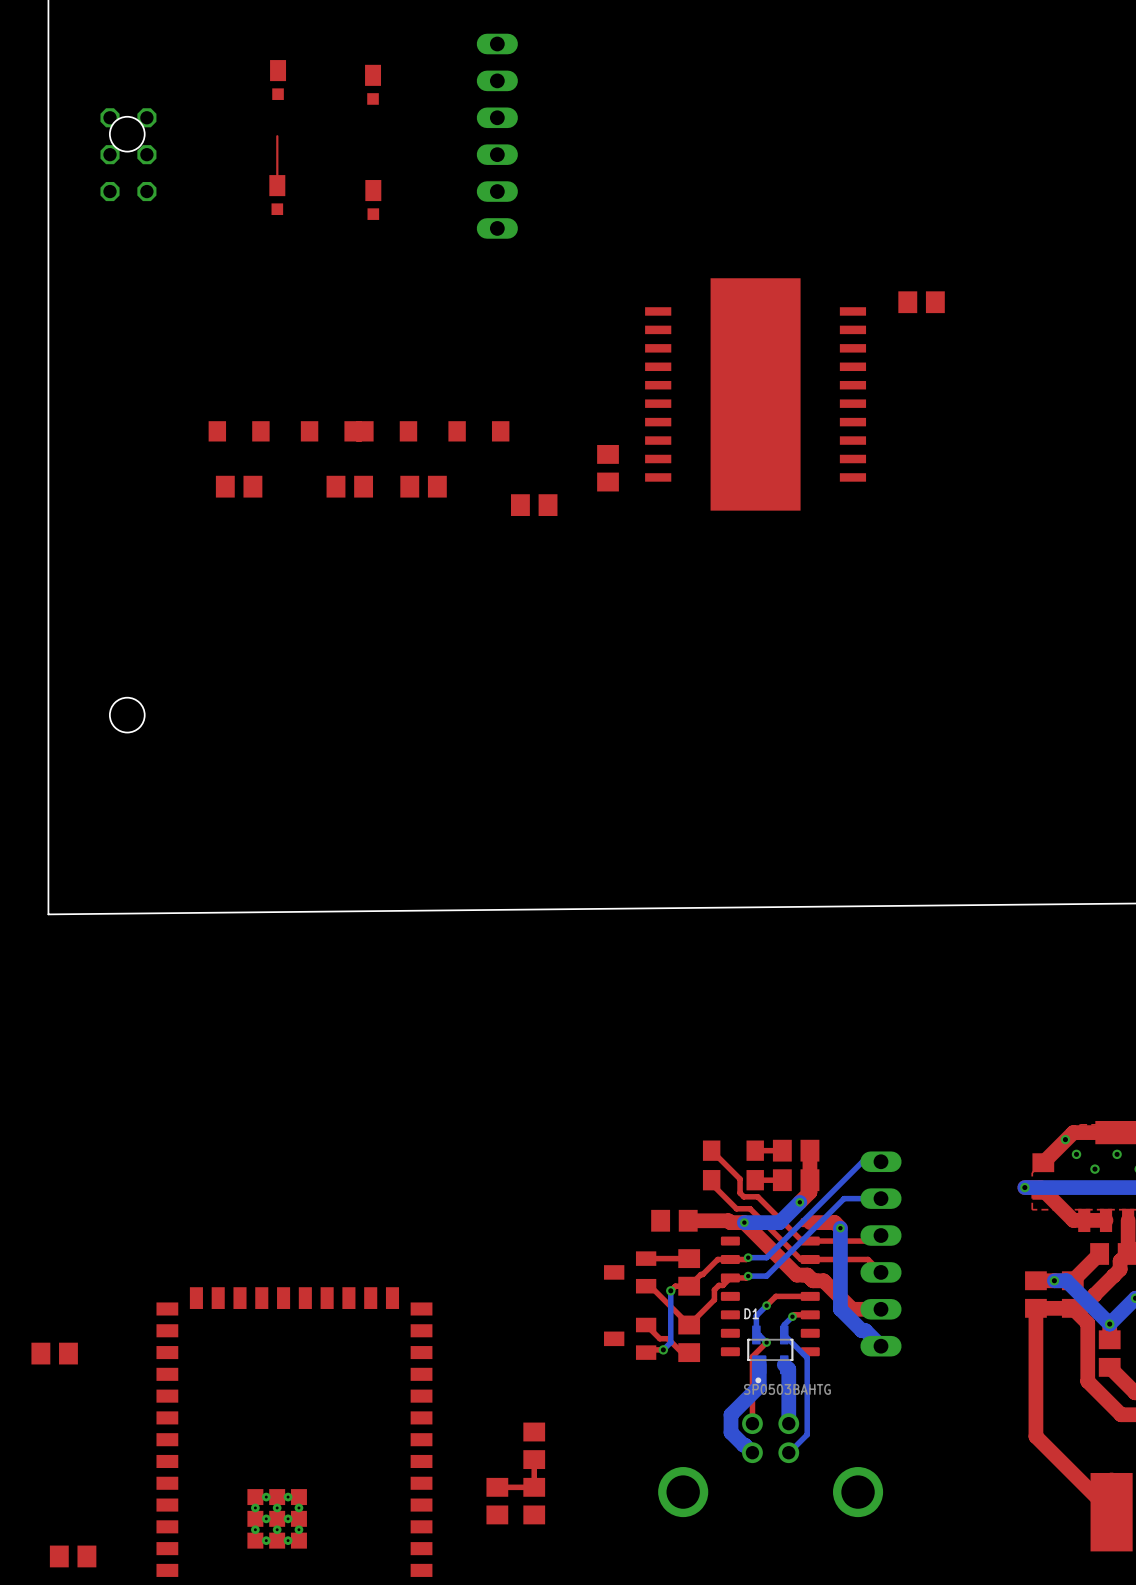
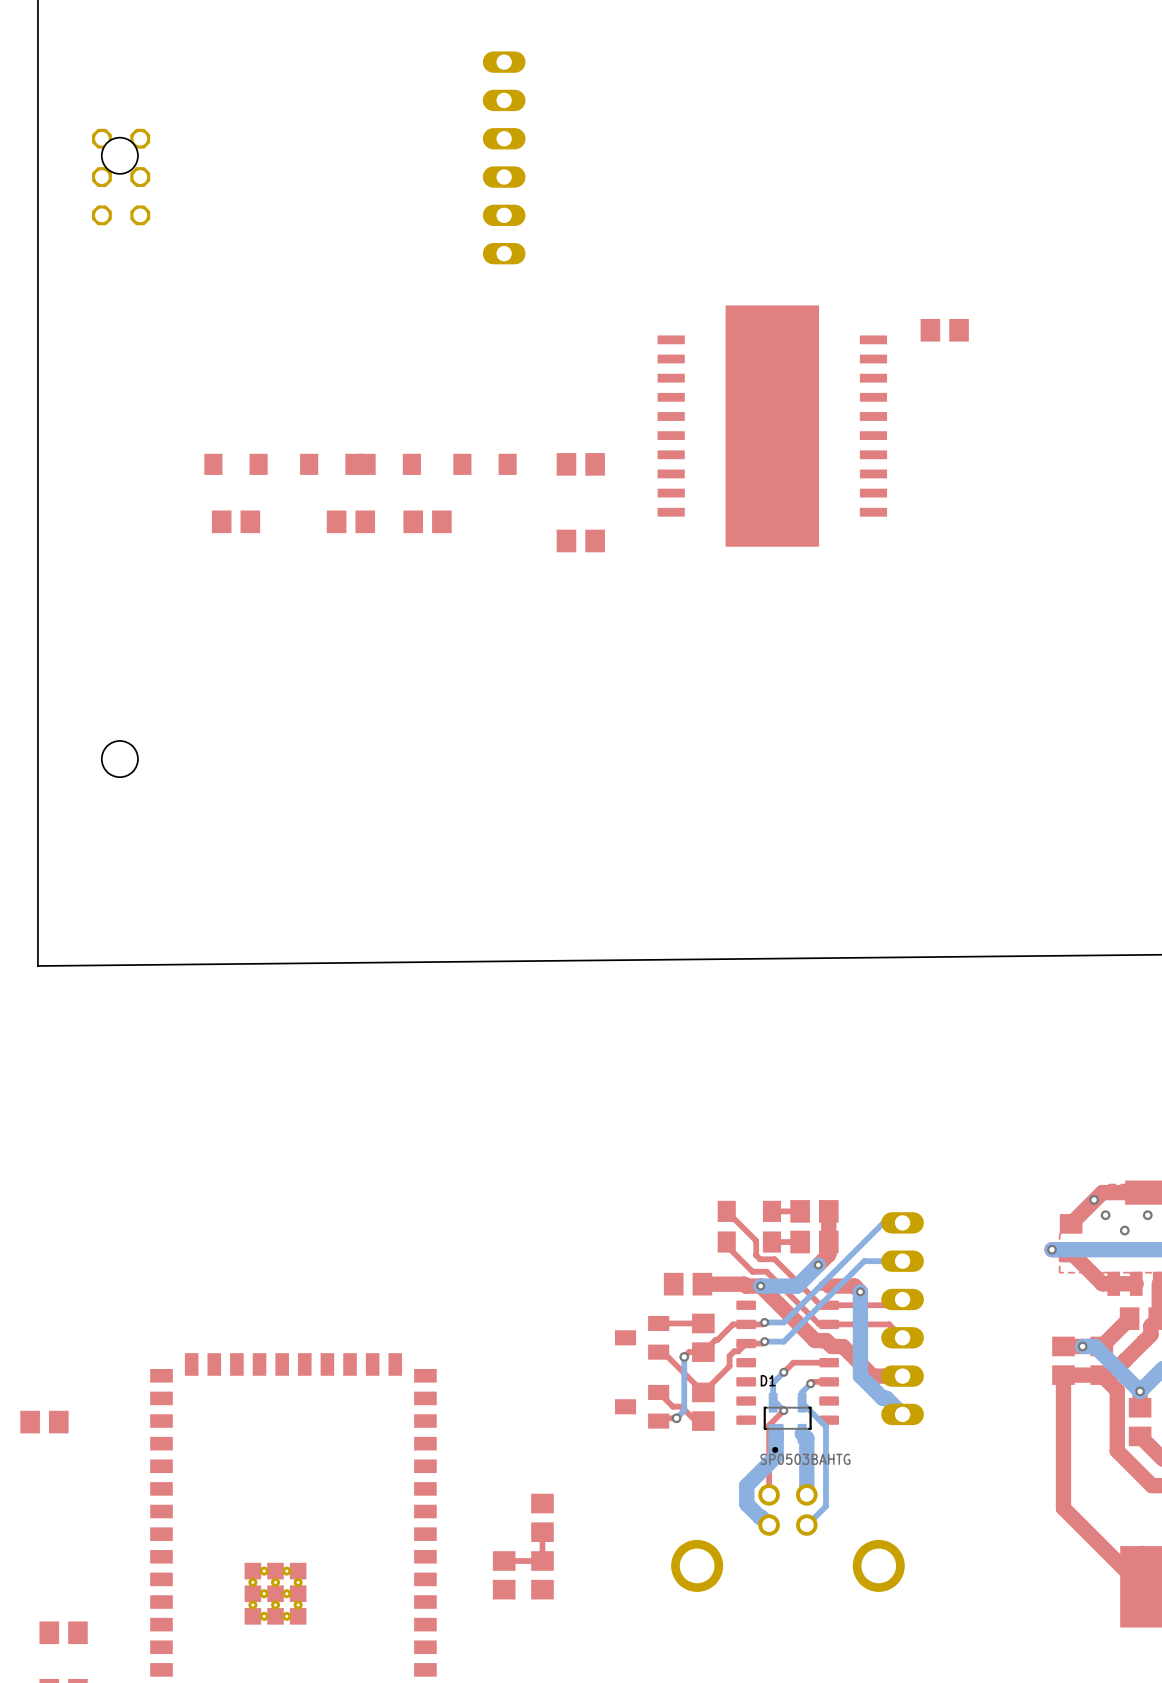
part: (278, 80) -> none
part: (373, 84) -> none
top track: (277, 136) (277, 185) -> none
part: (277, 195) -> none
part: (373, 199) -> none
part: none -> (580, 464)
part: (608, 468) -> none
part: (534, 505) -> none
part: none -> (580, 540)

